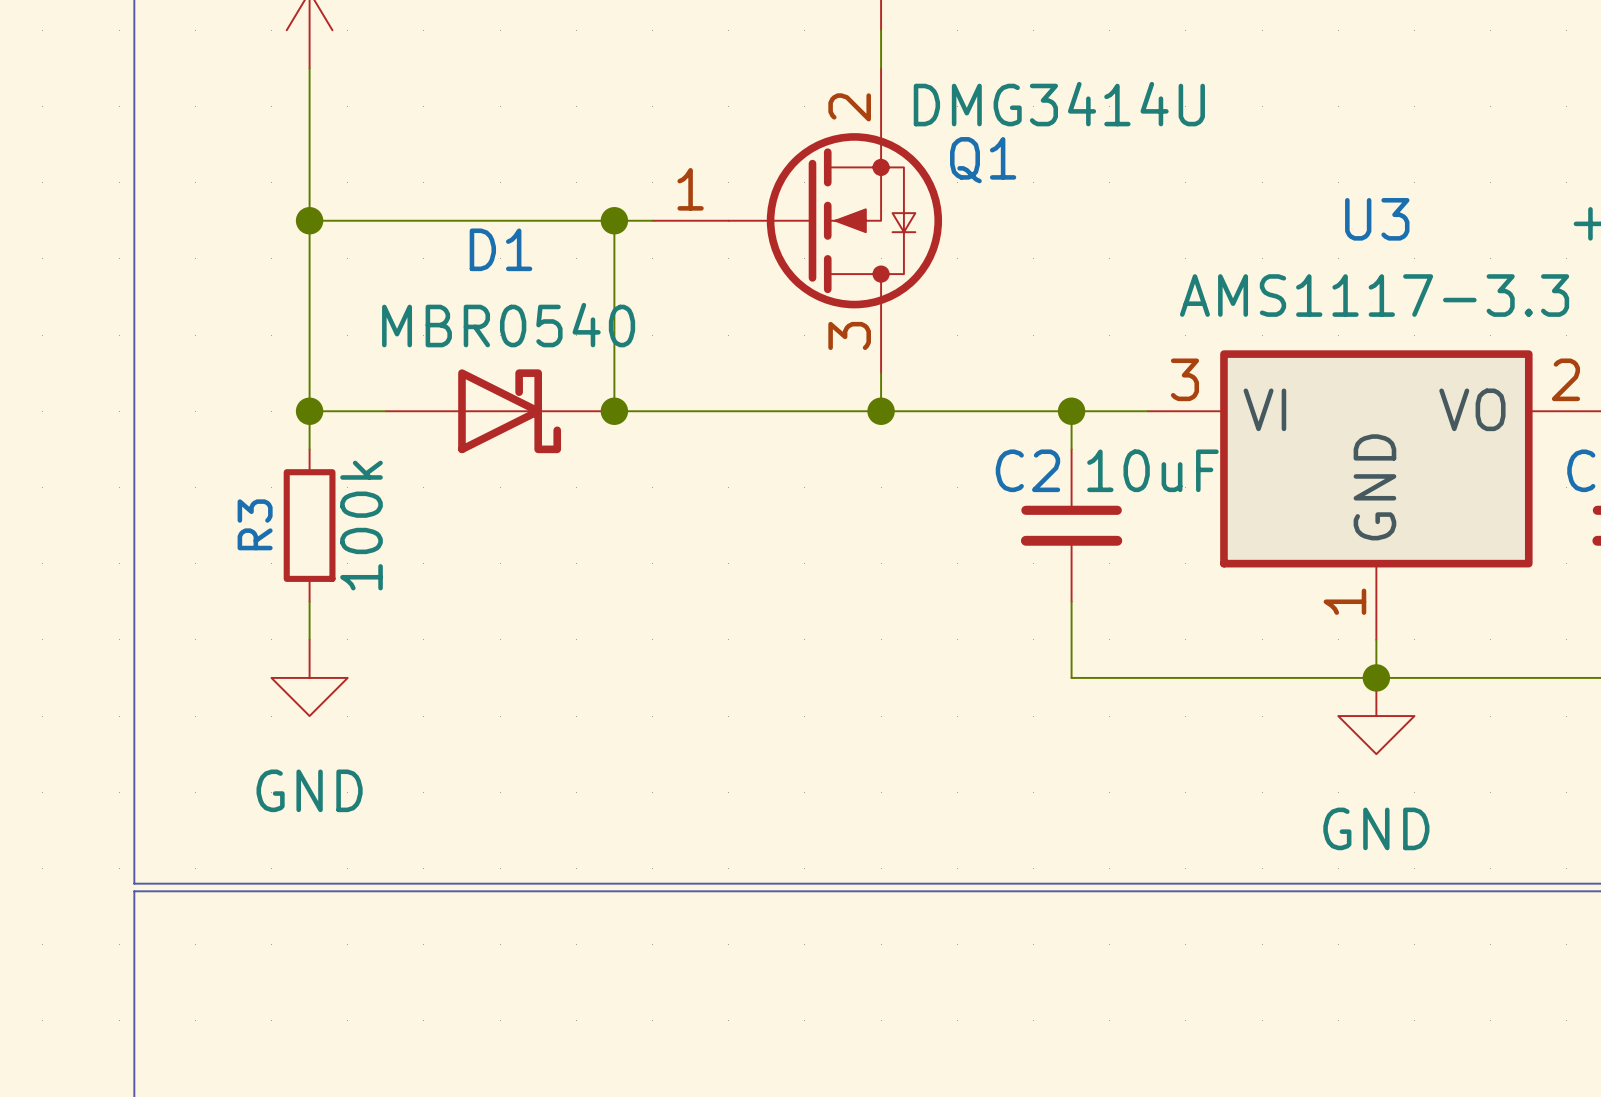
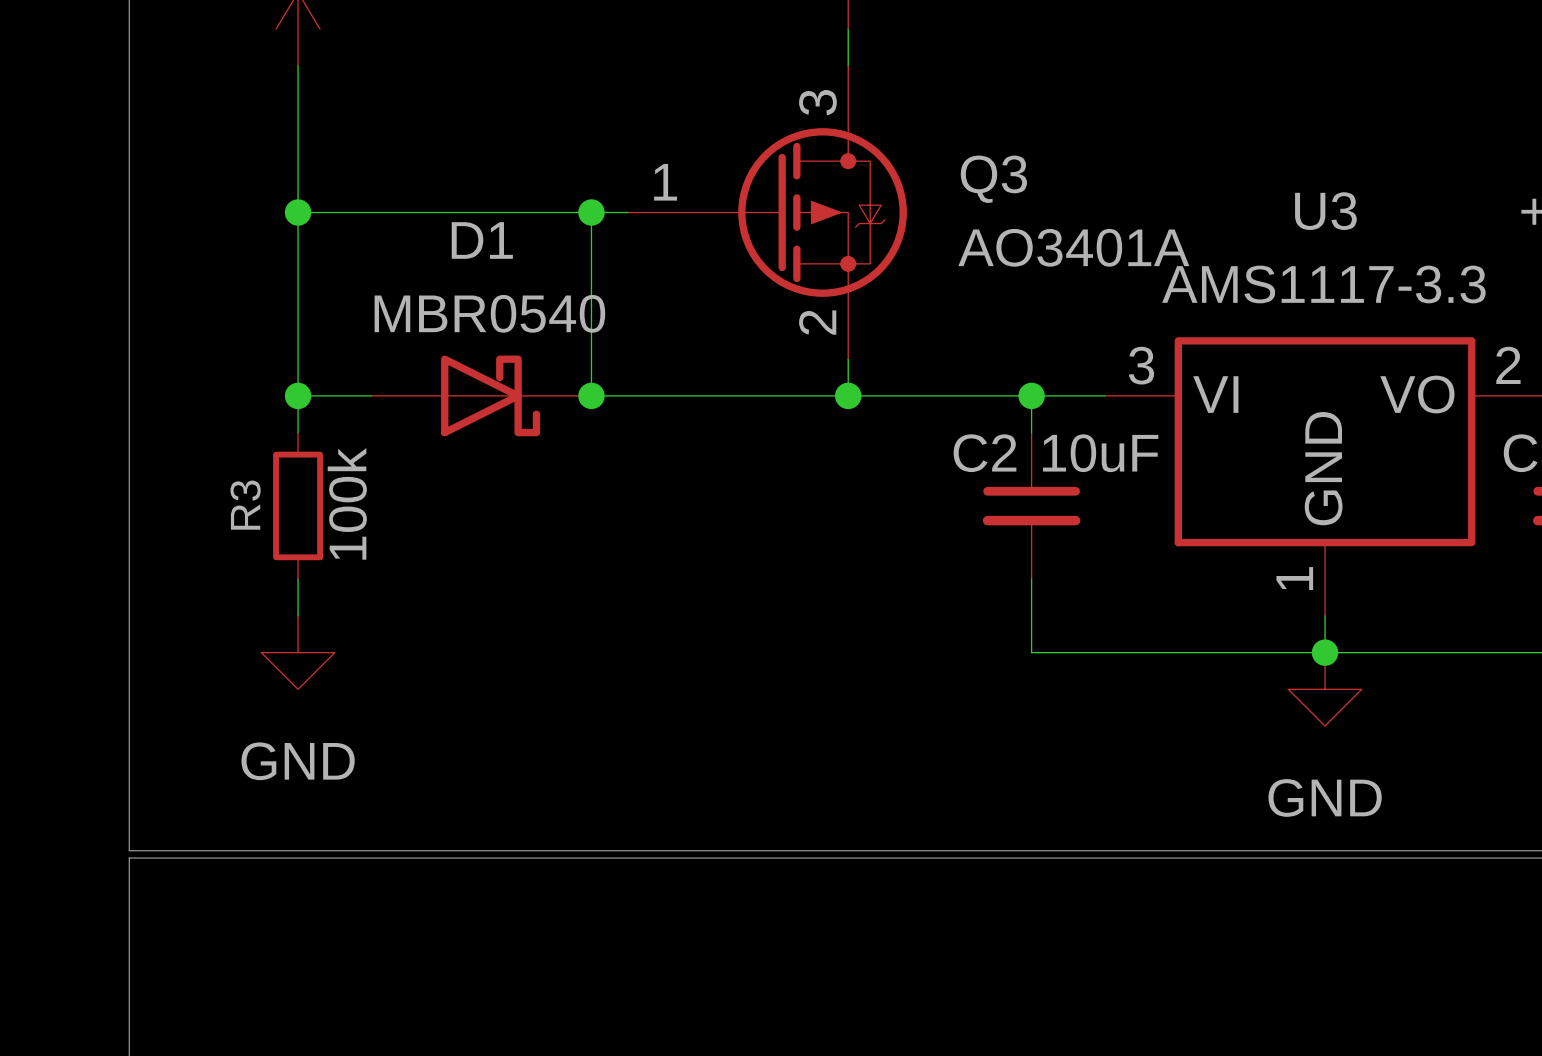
Q1: DMG3414U (797, 220) -> none
Q3: none -> AO3401A (767, 212)

